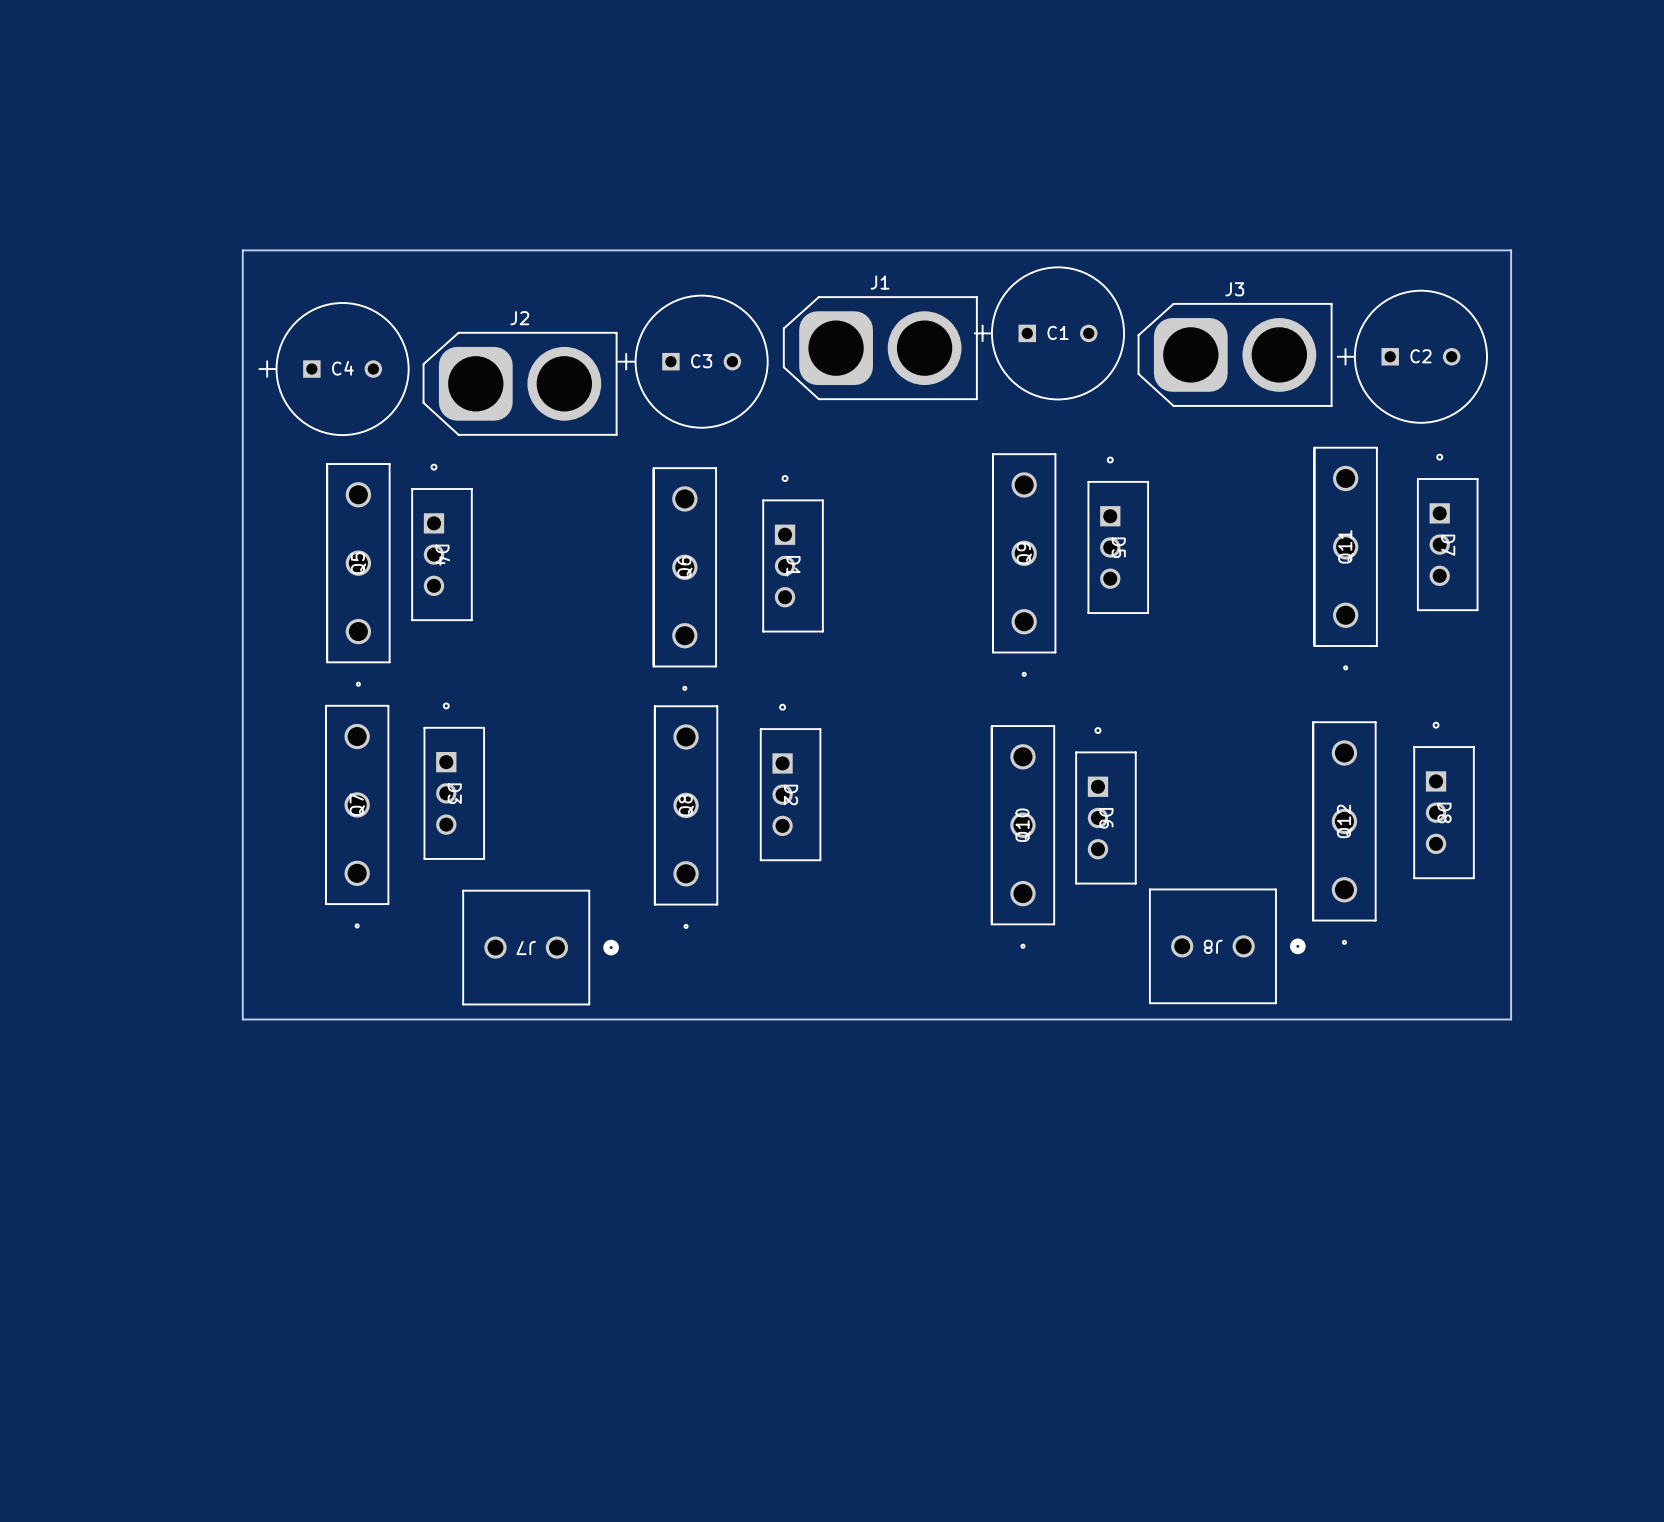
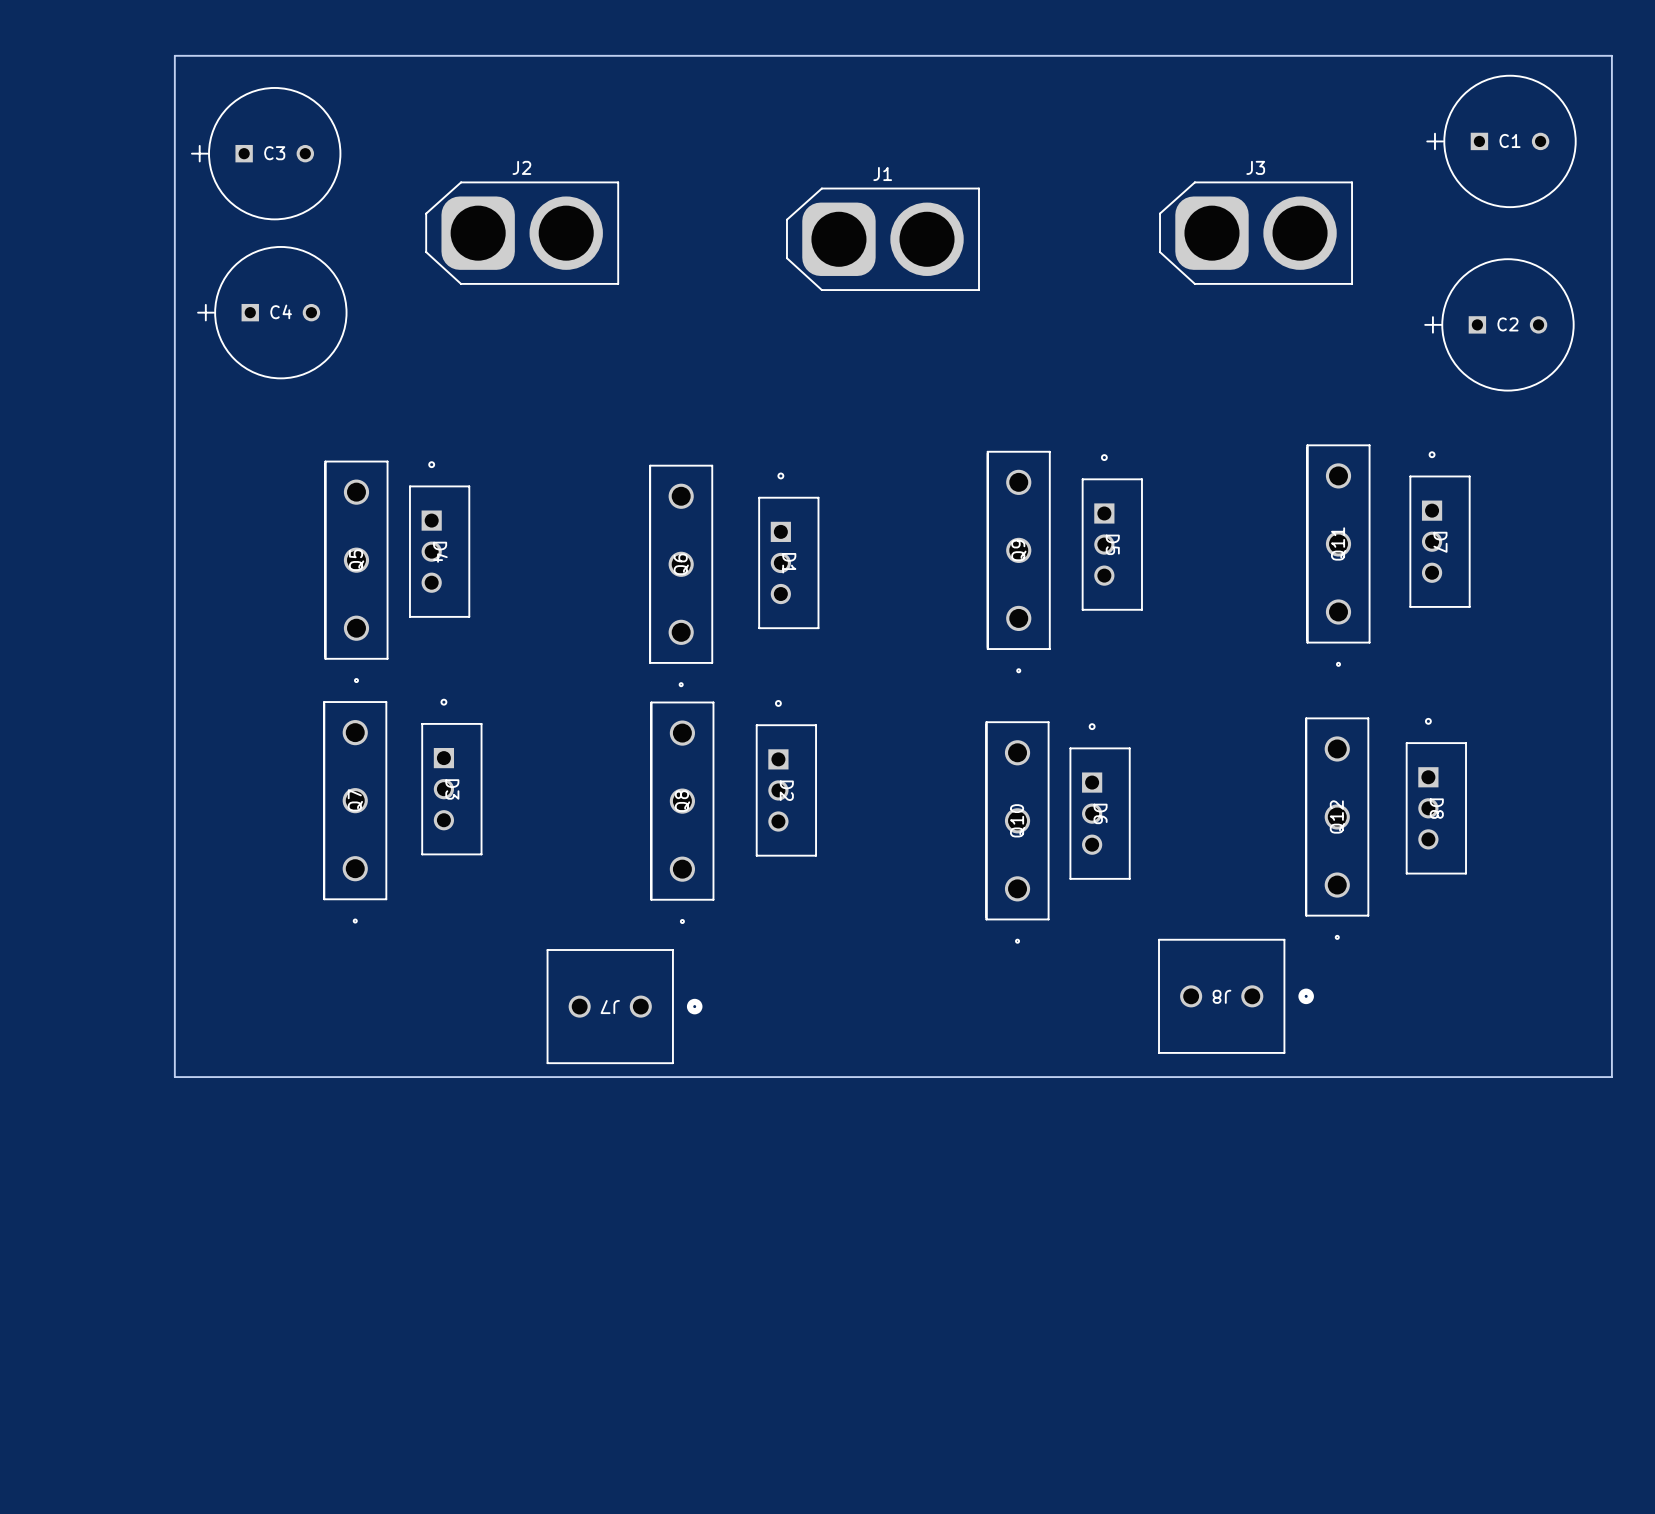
board edge: (242, 250) (1511, 250) (1511, 1019) (242, 1019) (242, 250) -> (174, 55) (174, 1077) (1611, 1077) (1611, 55) (174, 55)
C1 position: (1049, 333) -> (1501, 141)
J1 position: (880, 348) -> (882, 239)
J3 position: (1235, 354) -> (1256, 233)
C2 position: (1412, 356) -> (1499, 324)
C3 position: (693, 361) -> (266, 153)
C4 position: (334, 369) -> (272, 312)
J2 position: (520, 383) -> (522, 233)
J8 position: (1227, 946) -> (1236, 996)
J7 position: (540, 947) -> (624, 1006)

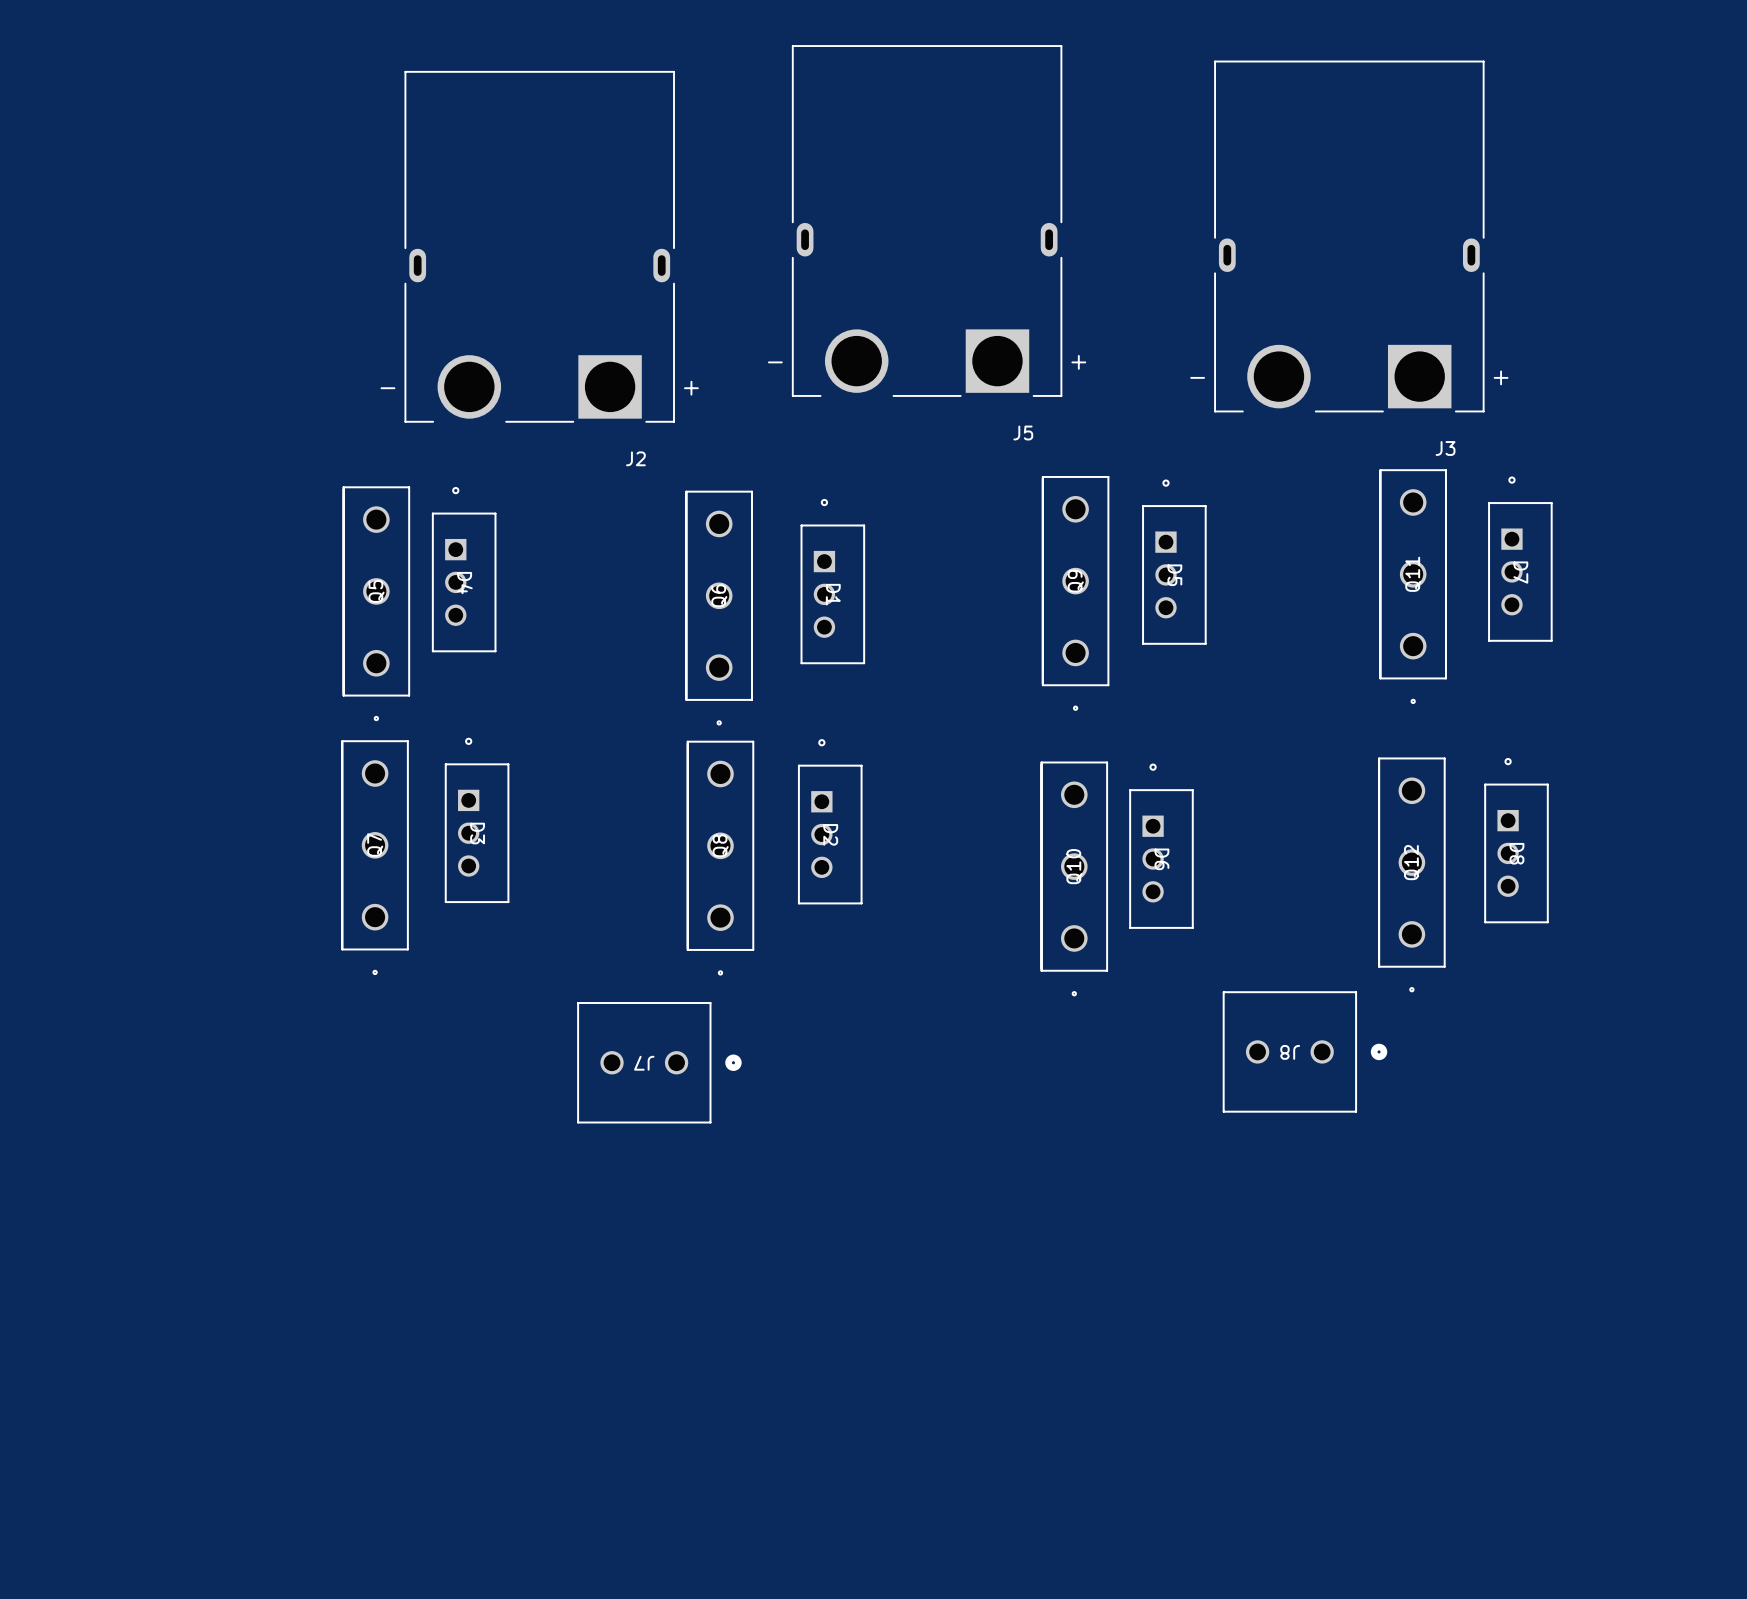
board edge: (174, 55) (1611, 55) (1611, 1077) (174, 1077) (174, 55) -> none
C1: (1501, 141) -> none
C3: (266, 153) -> none
J2 name position: J2 (521, 167) -> J2 (635, 458)
J3 name position: J3 (1255, 167) -> J3 (1445, 448)
J2 footprint: [425, 181, 619, 285] -> [380, 71, 699, 423]
J3 footprint: [1159, 181, 1353, 285] -> [1190, 60, 1509, 413]
J5: none -> (927, 220)
J1: (882, 239) -> none
C4: (272, 312) -> none
C2: (1499, 324) -> none

